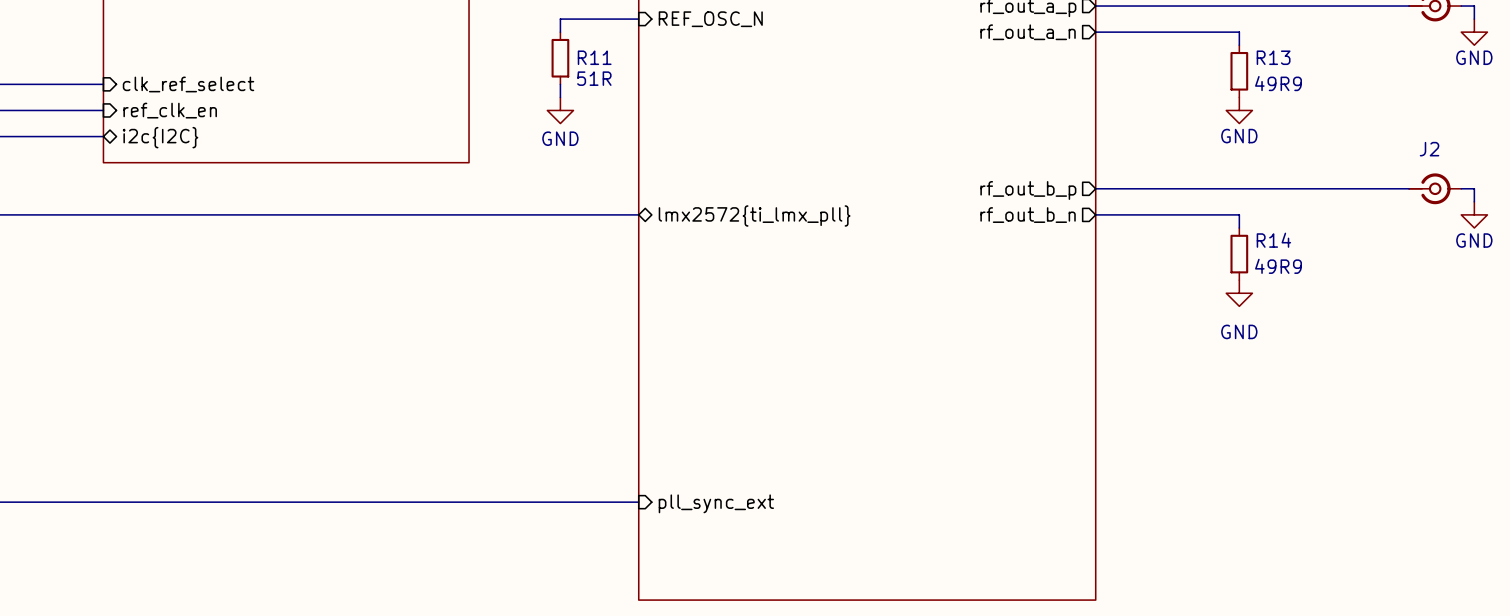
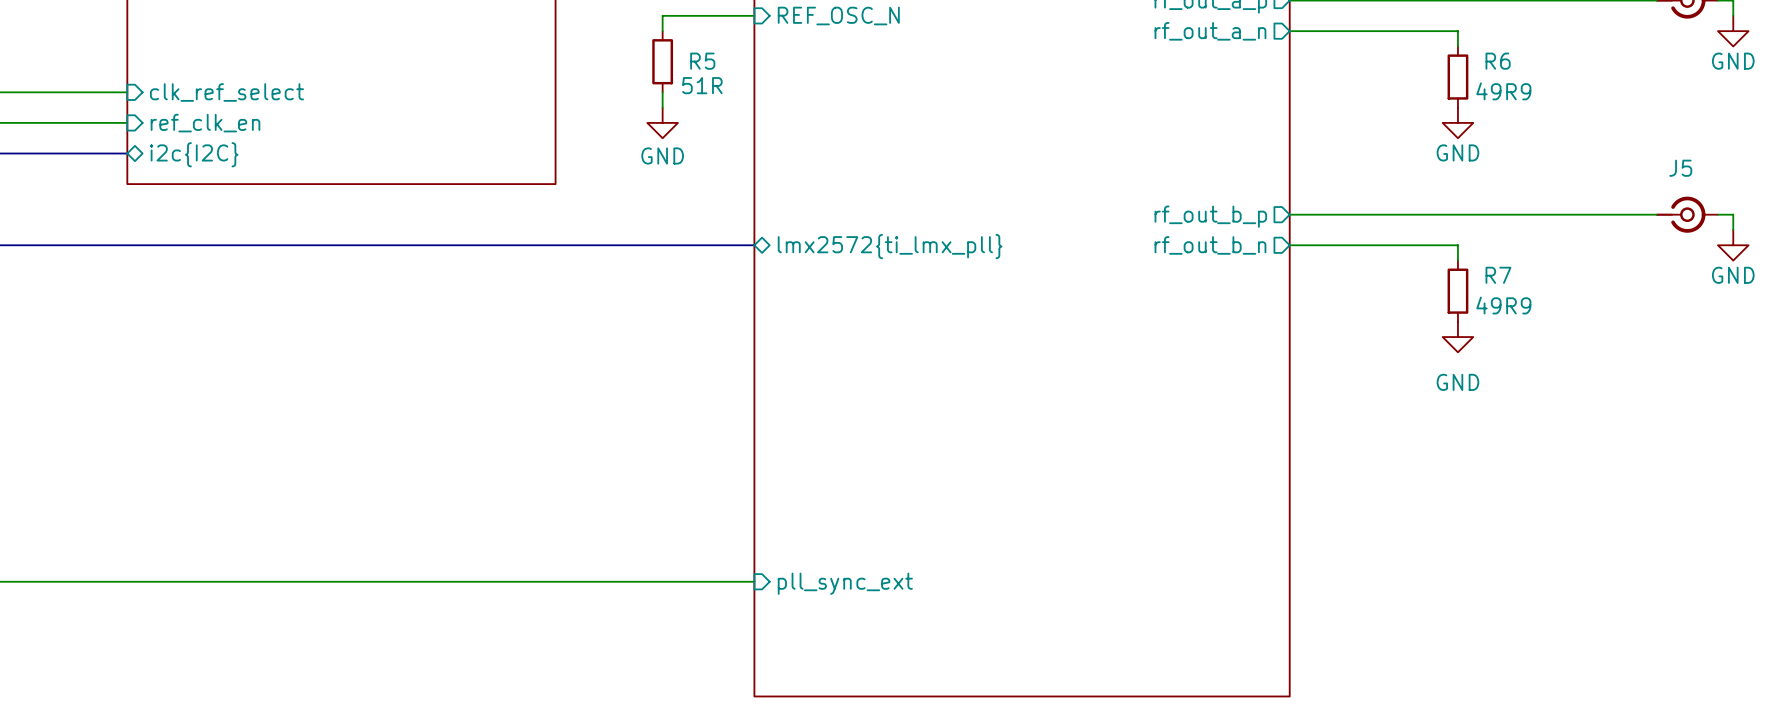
R11 name: R11 (594, 57) -> R5 (702, 61)
R13 name: R13 (1273, 57) -> R6 (1498, 61)
J2 name: J2 (1429, 149) -> J5 (1680, 168)
R14 name: R14 (1273, 240) -> R7 (1498, 275)

